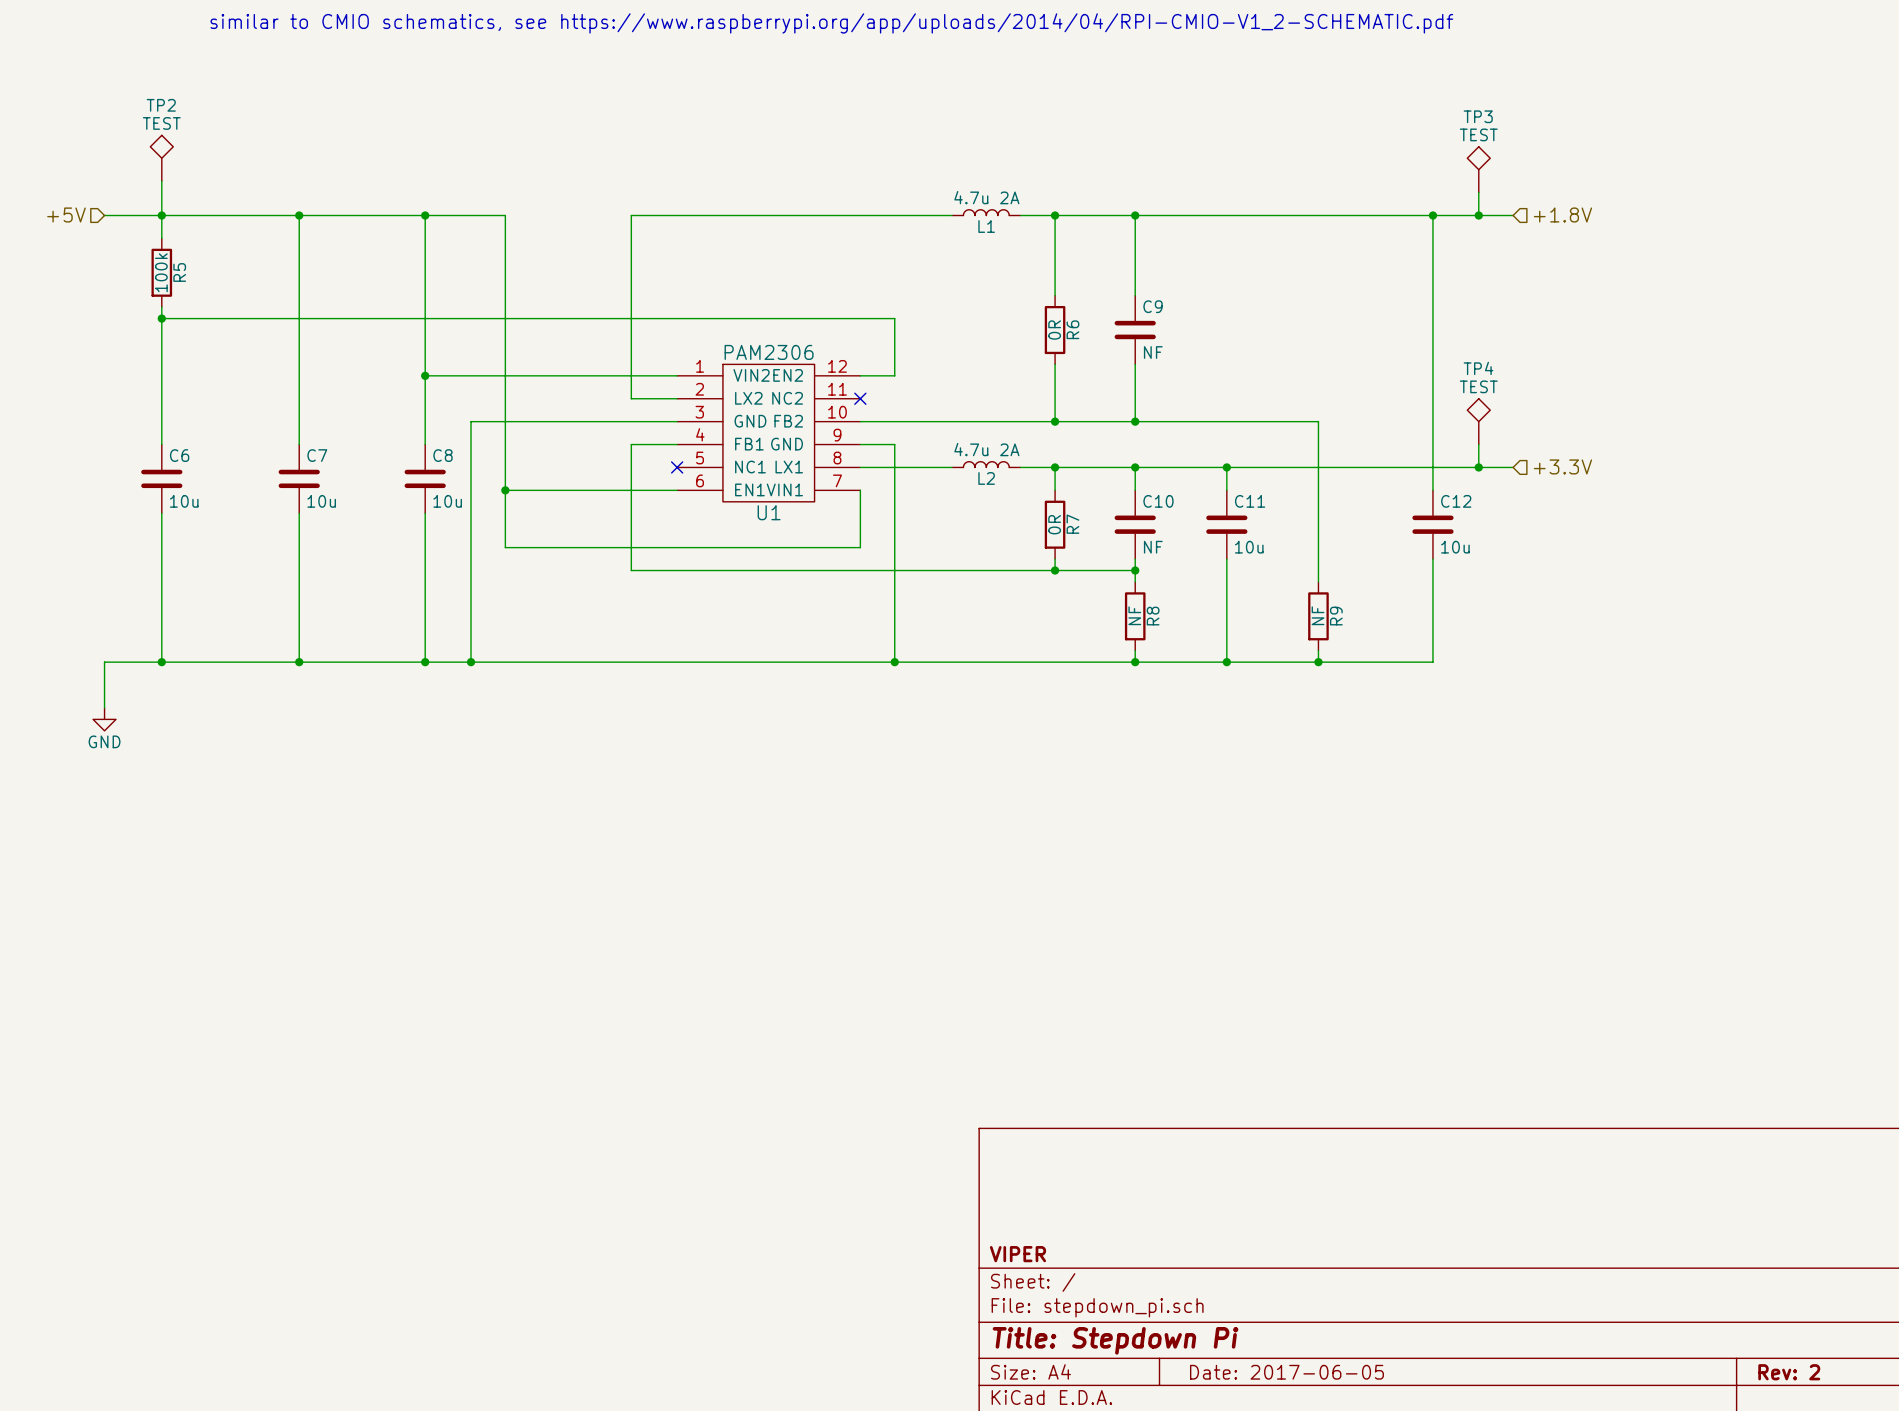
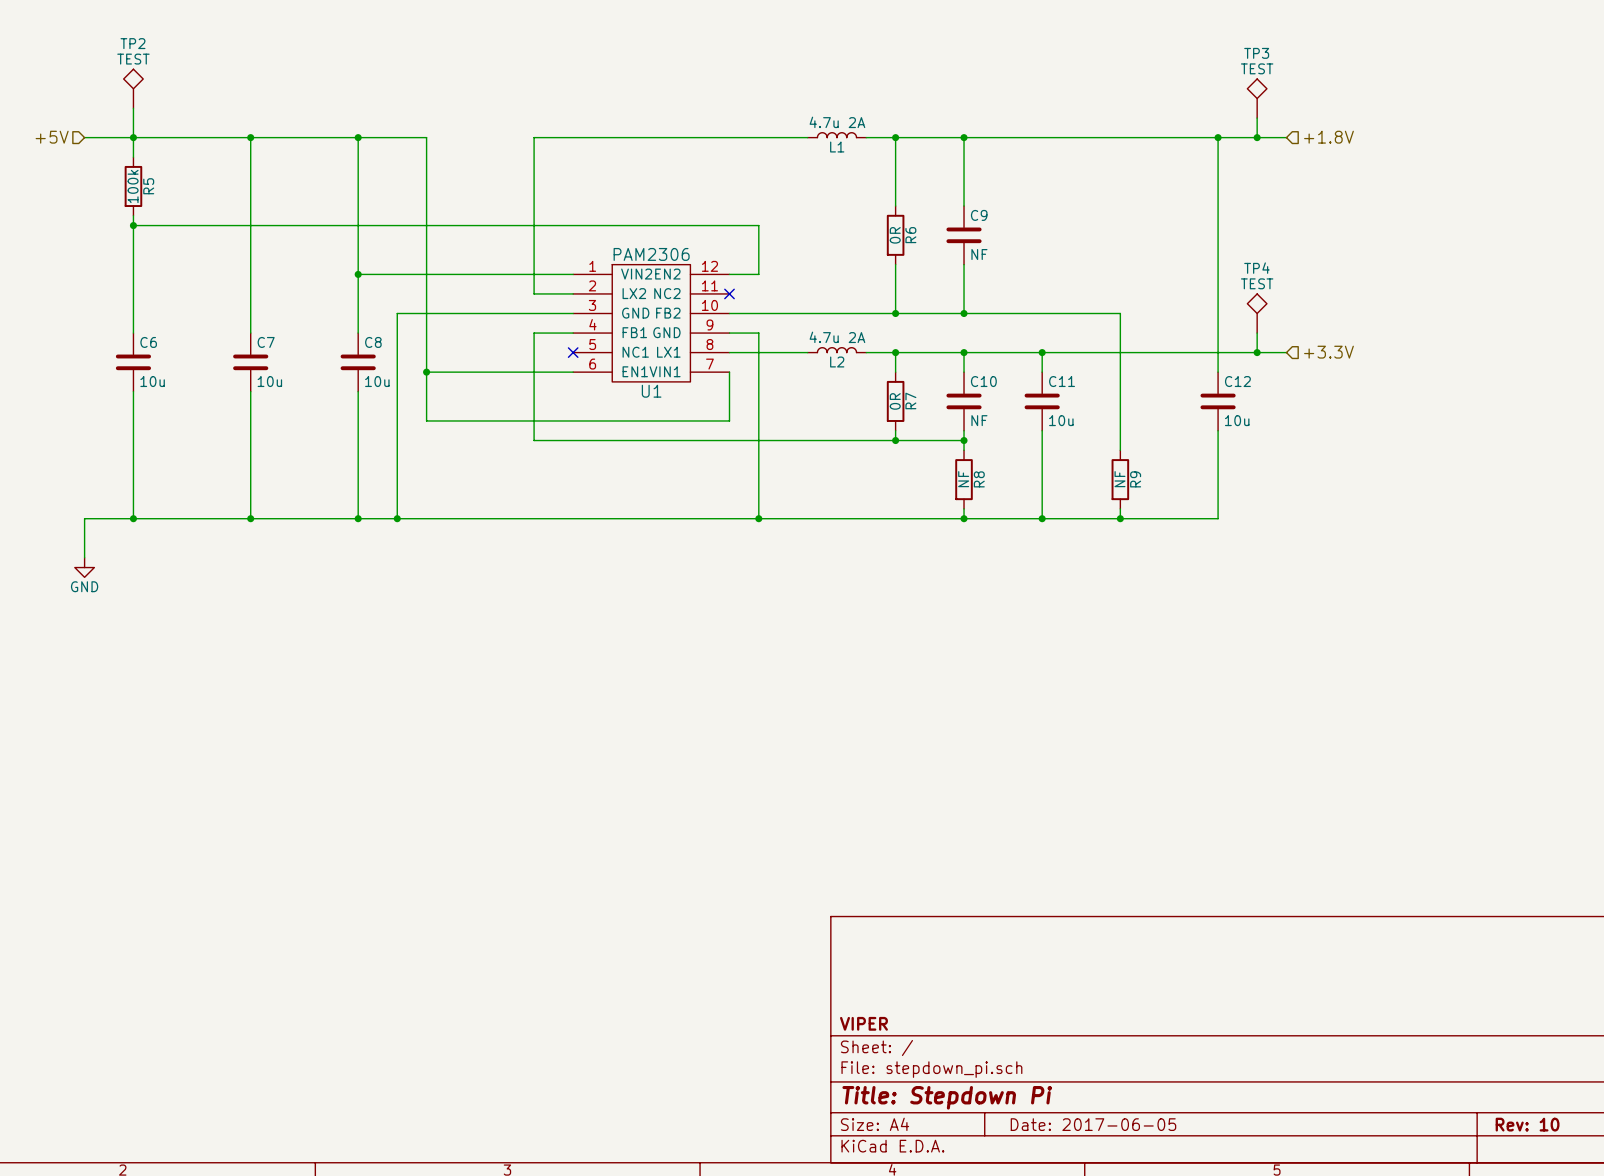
title block: Rev: 2 (1789, 1372) -> Rev: 10 (1527, 1124)

